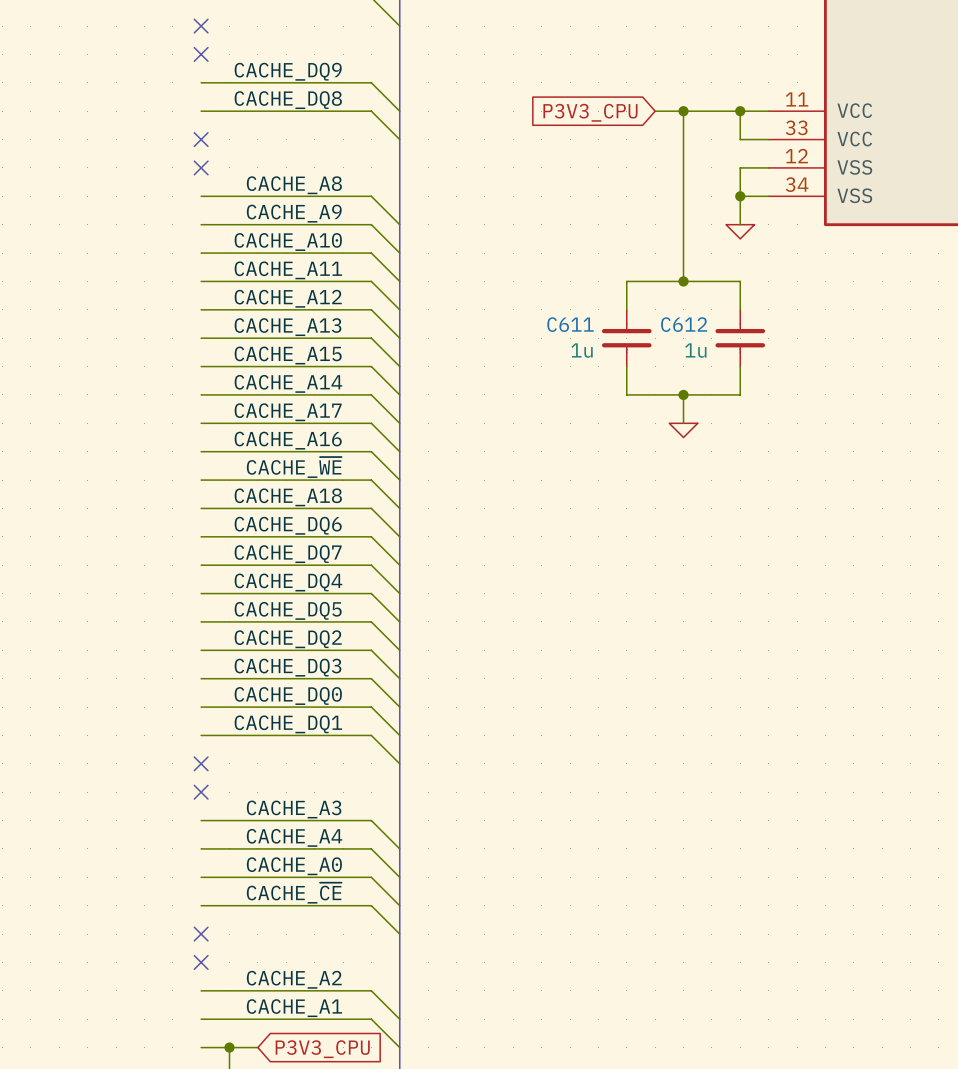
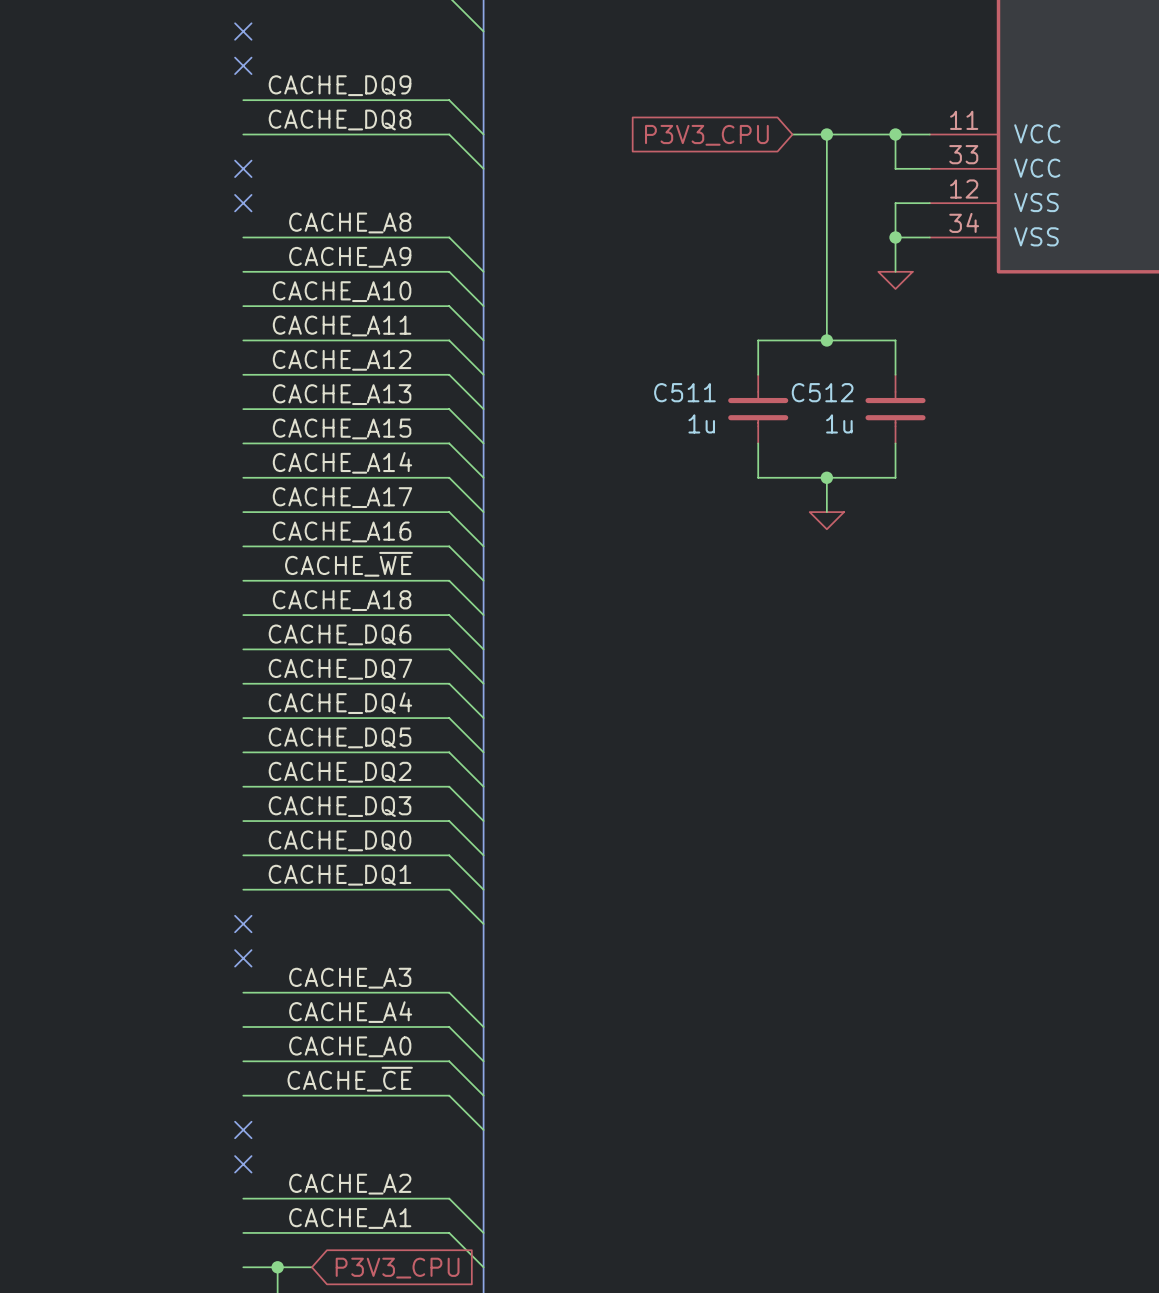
C611 name: C611 (570, 324) -> C511 (684, 392)
C612 name: C612 (684, 324) -> C512 (822, 392)

